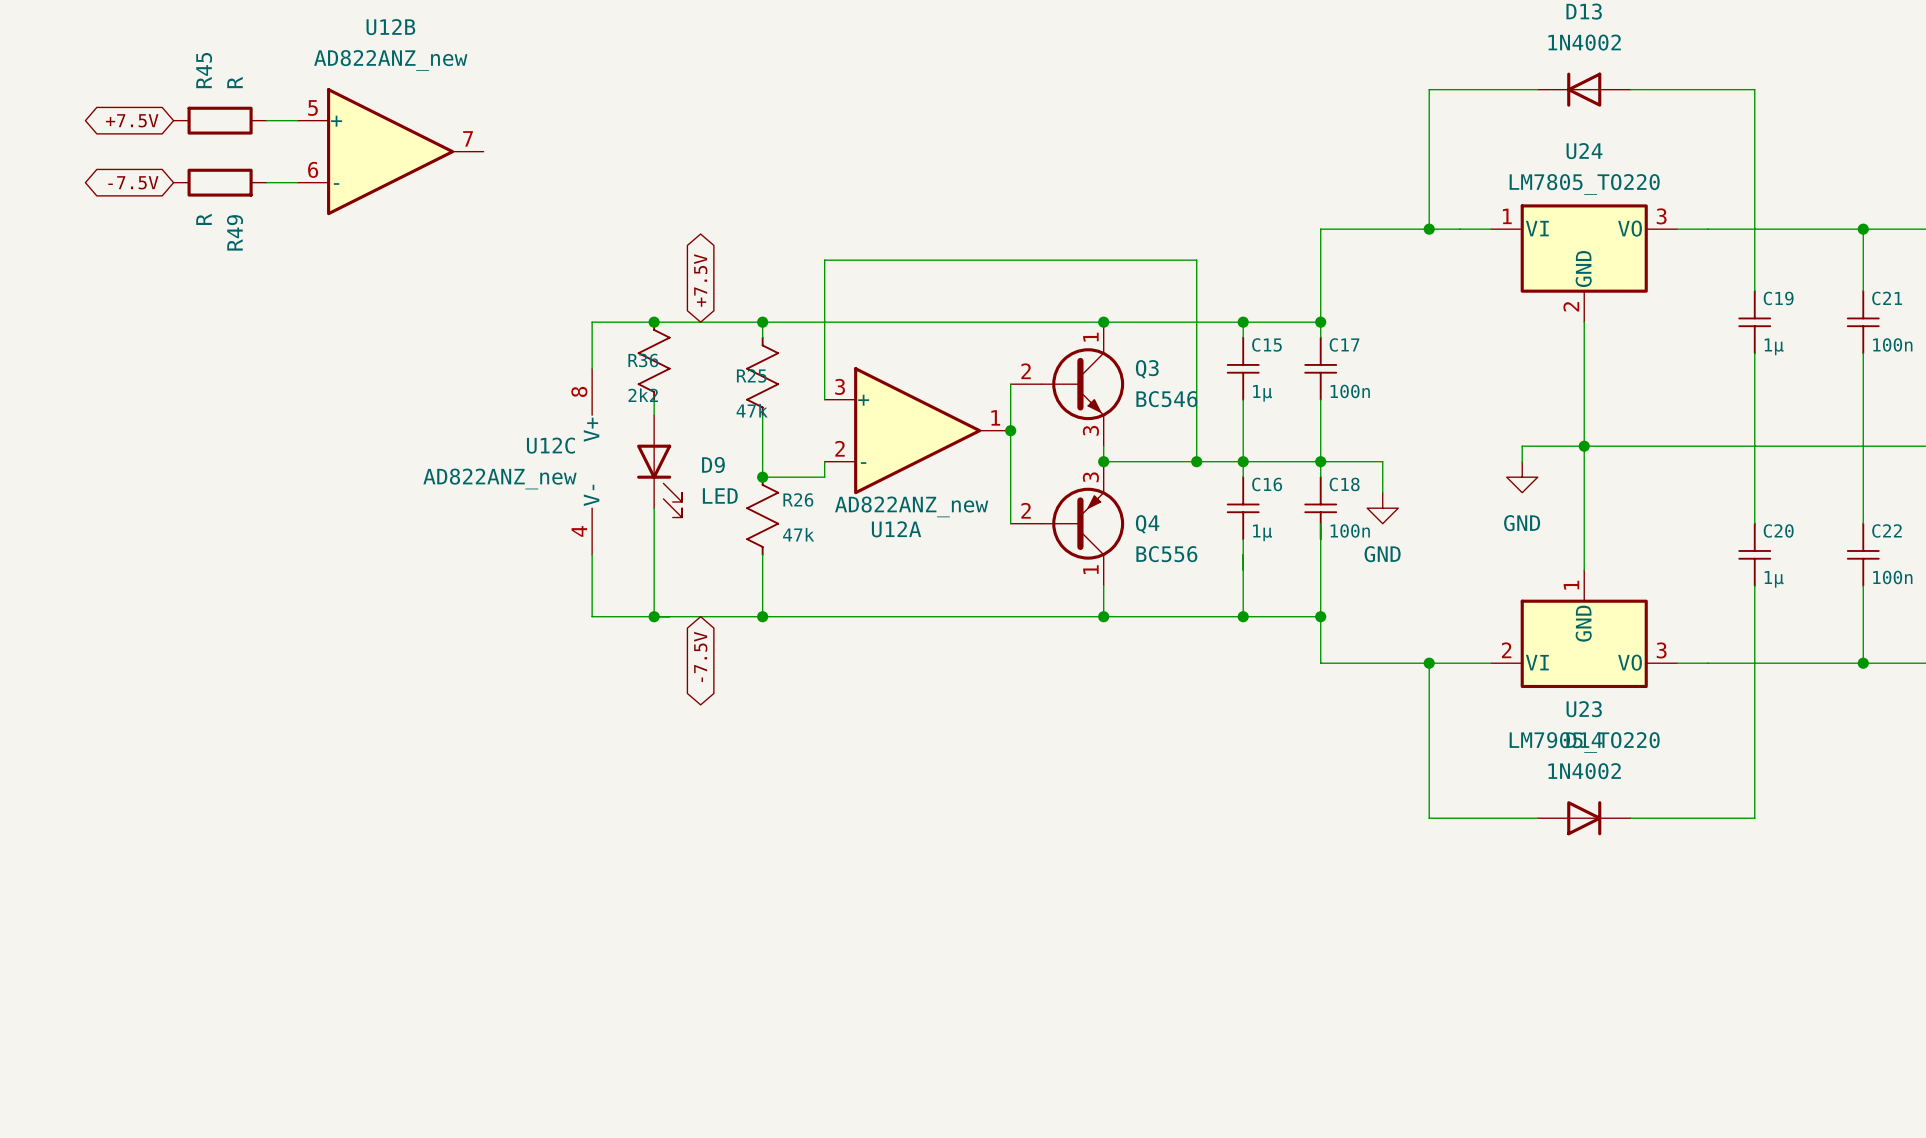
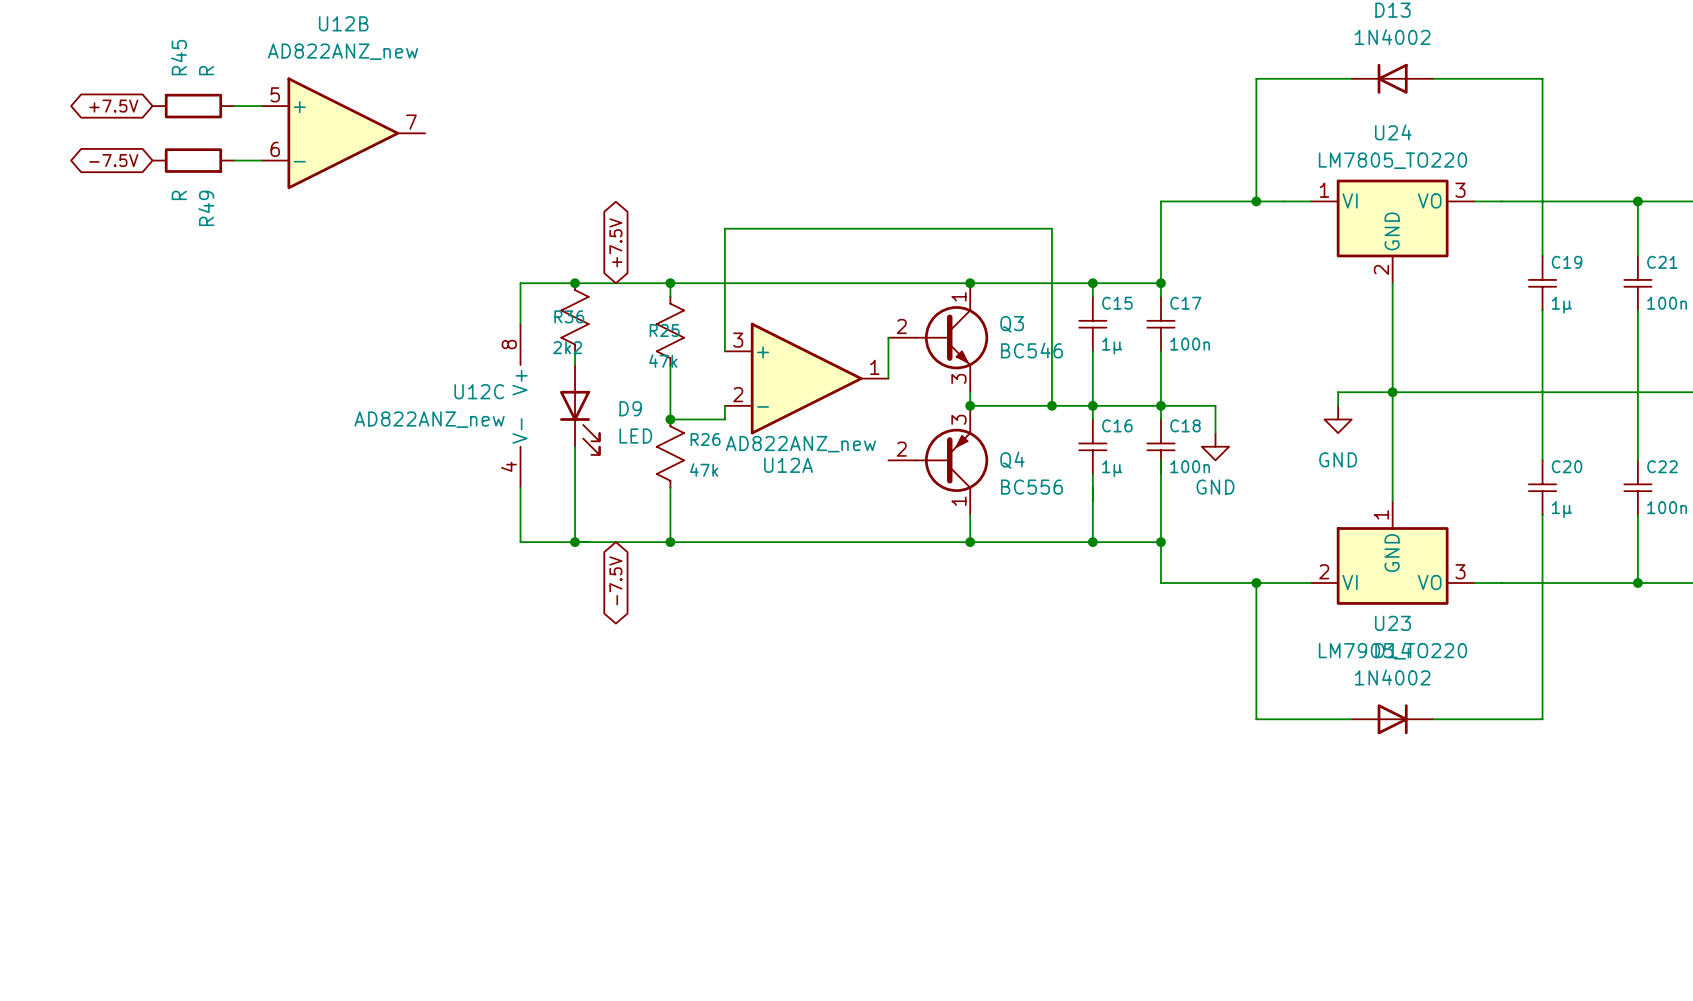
wire: (1010, 430) (1010, 523) -> none
junction: (1010, 430) -> none

